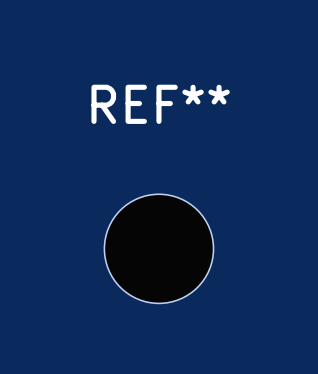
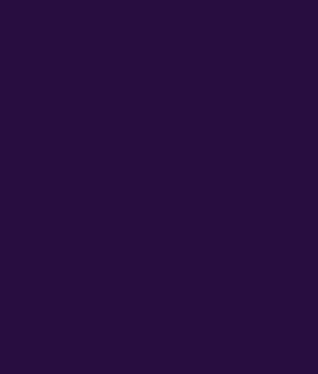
REF**: (158, 248) -> none

